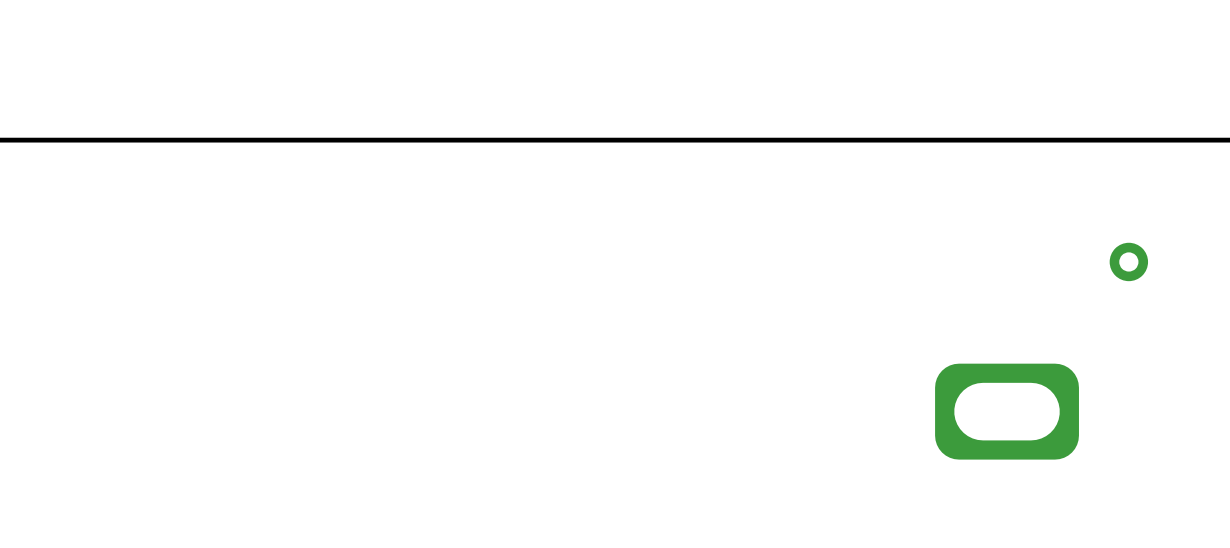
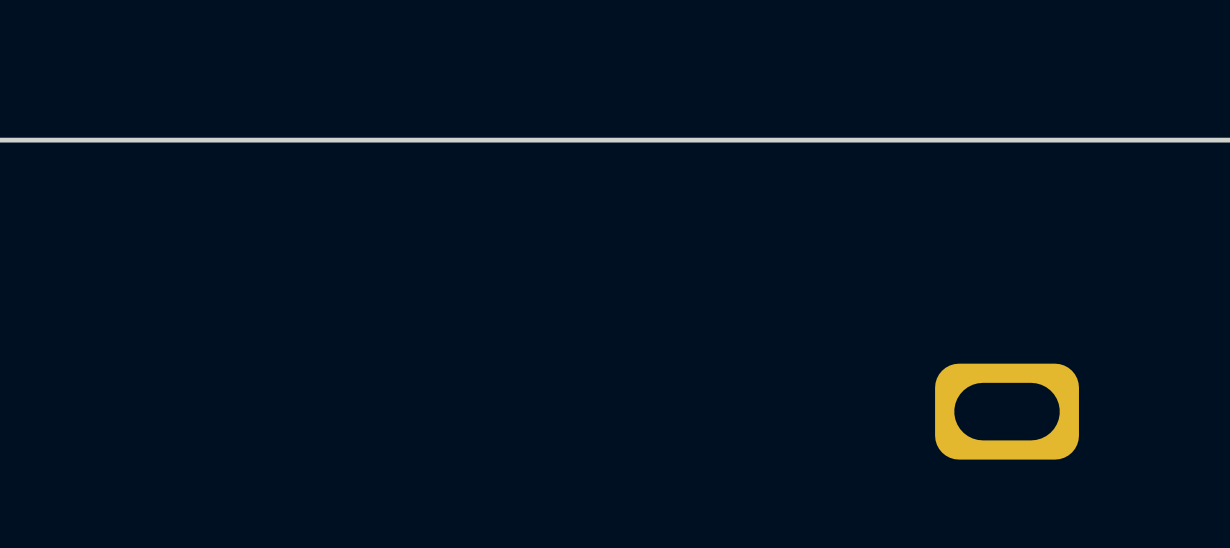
via: (1128, 261) -> none

